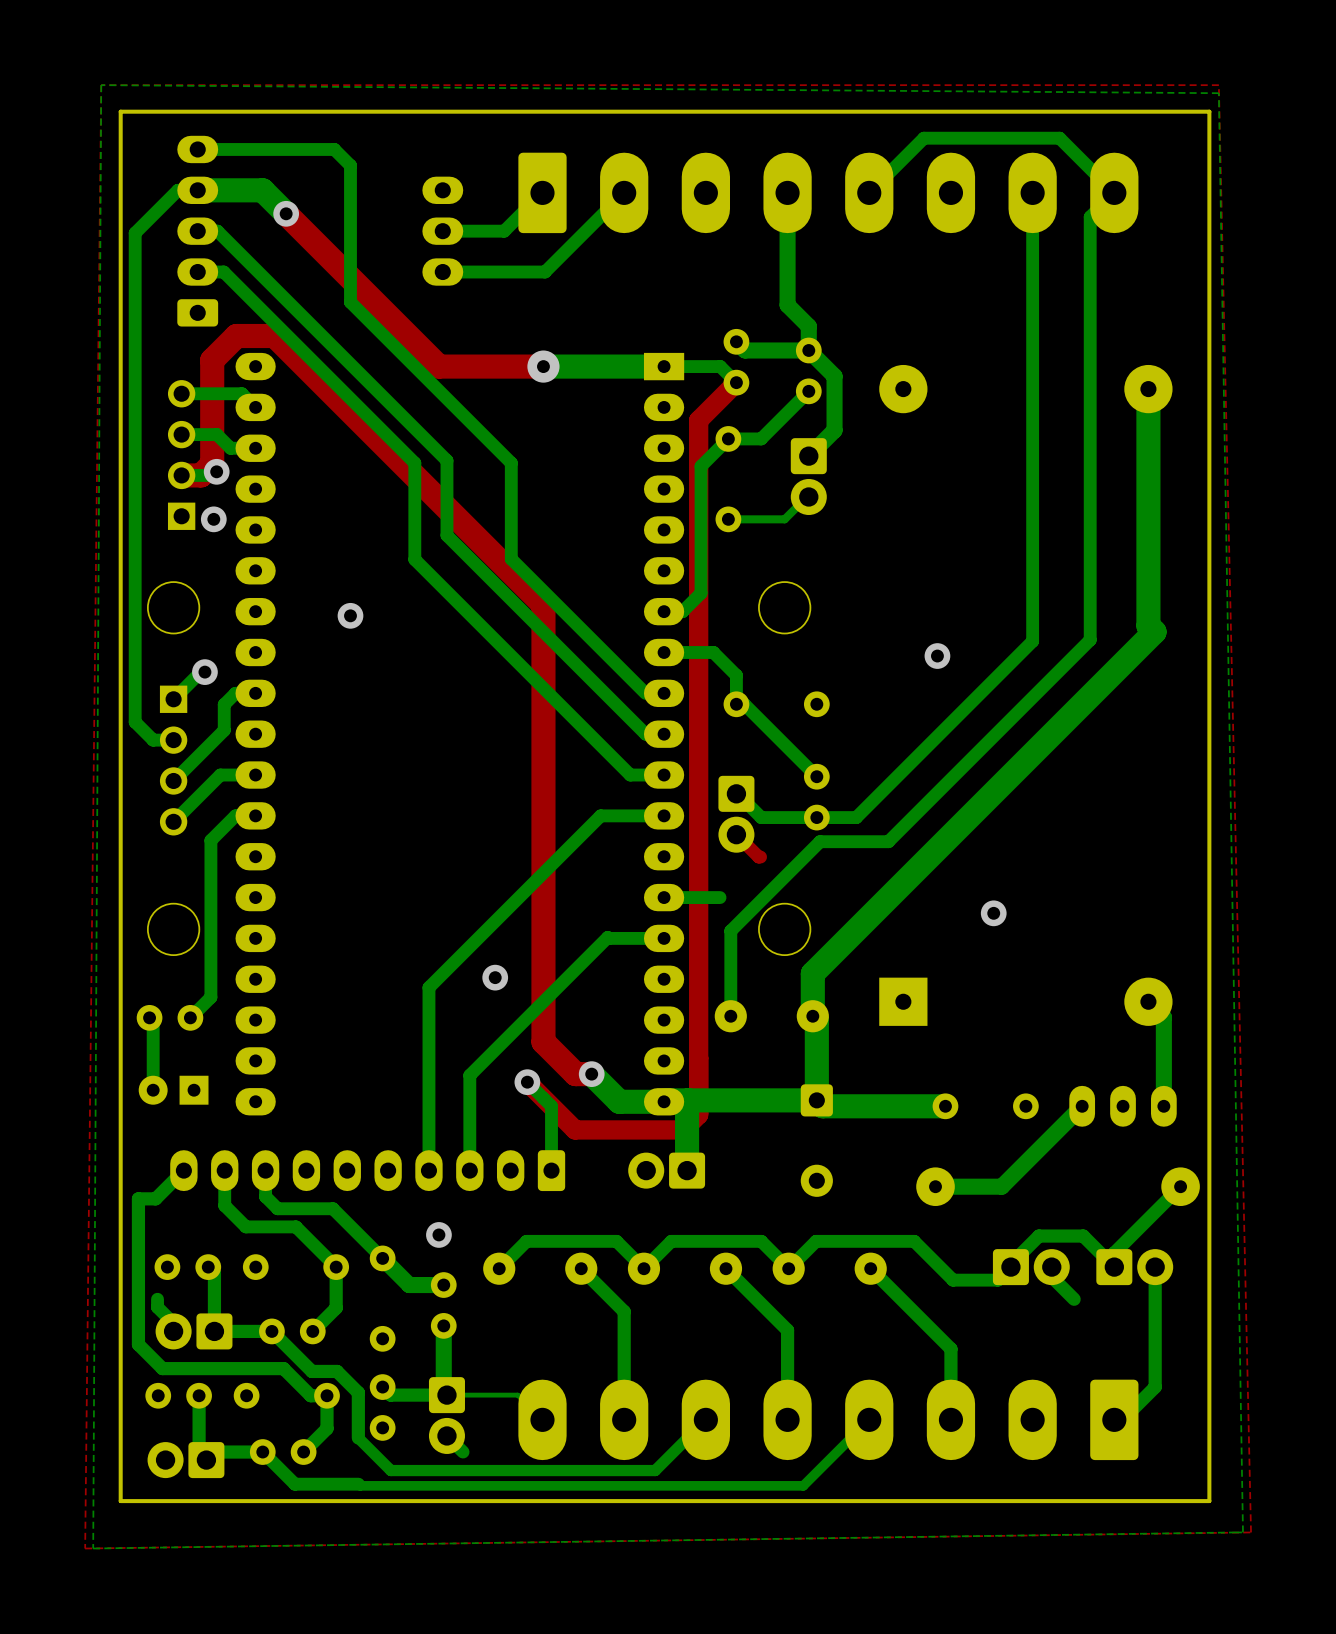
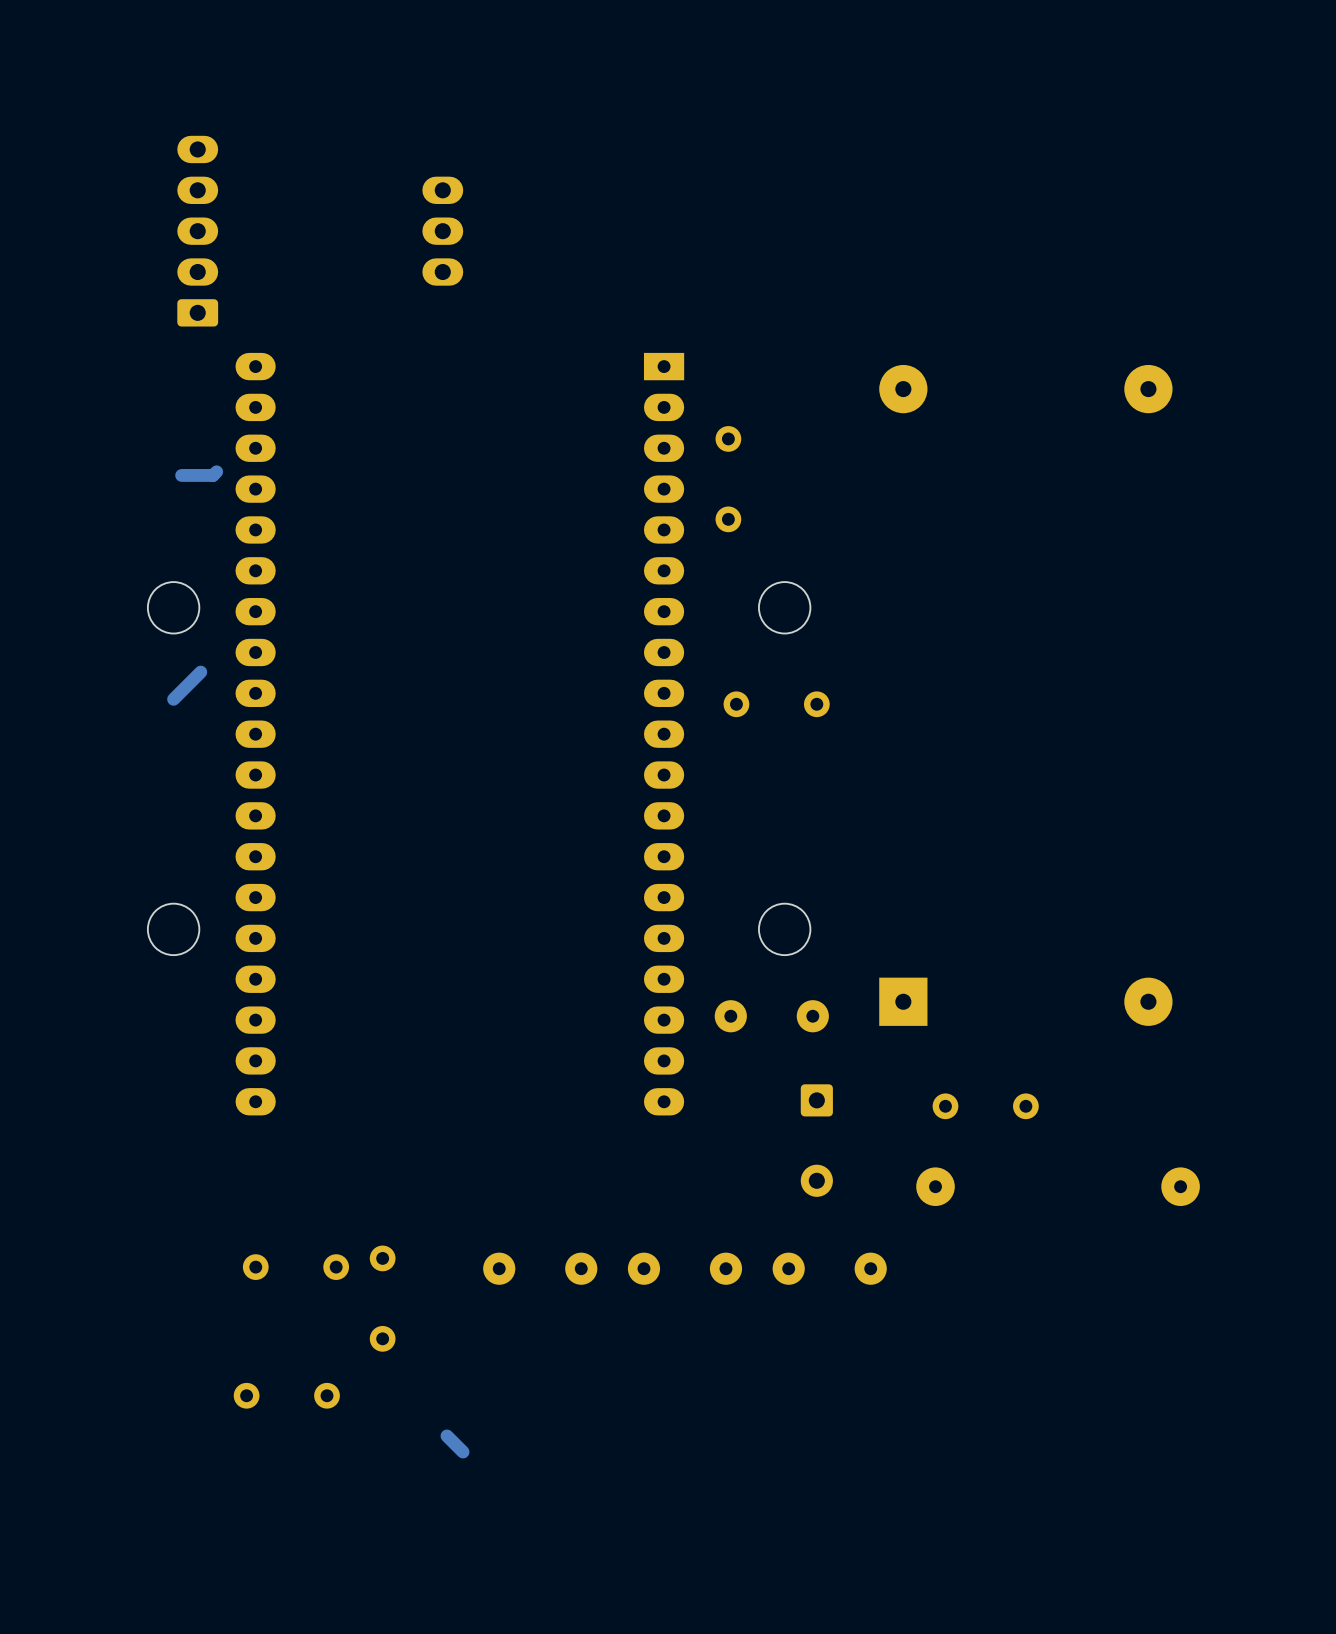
bottom zone outline: (101, 85) (1218, 93) (1242, 1532) (93, 1548) (101, 85) -> none
top zone outline: (1218, 85) (101, 85) (85, 1548) (1251, 1532) (1218, 85) -> none
board edge: (1209, 111) (120, 111) (120, 1501) (1209, 1501) (1209, 111) -> none
bottom track: (197, 149) (334, 149) (350, 165) (350, 302) (511, 463) (511, 559) (645, 693) -> none
bottom track: (542, 192) (504, 231) (442, 231) -> none
bottom track: (624, 192) (545, 272) (442, 272) -> none
bottom track: (787, 192) (787, 305) (808, 326) (808, 350) -> none
part: (828, 192) -> none
bottom track: (869, 192) (923, 138) (1059, 138) (1114, 192) (1090, 217) (1090, 639) (888, 841) (820, 841) (730, 930) (730, 1016) -> none
bottom track: (1032, 192) (1032, 641) (856, 817) (761, 817) (736, 793) -> none
top track: (286, 213) (438, 366) (543, 366) -> none
bottom track: (286, 213) (262, 190) (177, 190) (135, 233) (135, 722) (153, 740) (173, 740) -> none
via: (286, 213) -> none
bottom track: (197, 231) (217, 231) (446, 460) (446, 535) (645, 734) (664, 734) -> none
bottom track: (197, 272) (223, 272) (414, 463) (414, 559) (630, 775) (664, 775) -> none
bottom track: (736, 341) (745, 350) (808, 350) -> none
bottom track: (808, 350) (834, 376) (834, 430) (808, 456) -> none
part: (736, 362) -> none
bottom track: (543, 366) (720, 366) (736, 382) -> none
via: (543, 366) -> none
part: (808, 370) -> none
top track: (736, 382) (698, 420) (698, 1114) (683, 1129) (575, 1129) (527, 1082) (574, 1129) (682, 1129) (698, 1113) -> none
bottom track: (1148, 389) (1148, 625) (1154, 631) (812, 973) (812, 1016) (816, 1020) (816, 1100) -> none
bottom track: (181, 390) (181, 393) (241, 393) (255, 407) -> none
bottom track: (808, 391) (761, 438) (728, 438) (701, 466) (701, 593) (682, 611) (664, 611) -> none
bottom track: (181, 434) (216, 434) (230, 448) (237, 448) -> none
part: (181, 455) -> none
via: (216, 471) -> none
top track: (181, 475) (200, 475) (212, 464) (212, 360) (236, 336) (274, 336) (543, 604) (543, 1041) (575, 1074) (591, 1074) -> none
part: (808, 476) -> none
bottom track: (808, 496) (784, 519) (728, 519) -> none
via: (213, 519) -> none
via: (350, 615) -> none
bottom track: (664, 652) (713, 652) (736, 675) (736, 704) (744, 704) (816, 776) -> none
via: (937, 656) -> none
via: (204, 672) -> none
bottom track: (255, 693) (235, 693) (224, 704) (224, 730) (173, 780) -> none
part: (173, 760) -> none
bottom track: (255, 775) (220, 775) (173, 821) -> none
part: (816, 797) -> none
part: (736, 814) -> none
bottom track: (255, 815) (235, 815) (210, 840) (210, 997) (190, 1017) -> none
bottom track: (664, 815) (600, 815) (428, 987) (428, 1170) -> none
top track: (736, 834) (760, 857) -> none
bottom track: (720, 897) (664, 897) -> none
via: (993, 913) -> none
bottom track: (664, 938) (607, 937) (469, 1075) (469, 1170) -> none
via: (495, 977) -> none
bottom track: (1148, 1001) (1163, 1017) (1163, 1106) -> none
bottom track: (149, 1017) (153, 1021) (153, 1090) -> none
part: (169, 1017) -> none
bottom track: (591, 1074) (619, 1101) (816, 1100) -> none
via: (591, 1074) -> none
bottom track: (527, 1082) (551, 1106) (551, 1170) -> none
via: (527, 1082) -> none
part: (173, 1090) -> none
bottom track: (688, 1100) (687, 1170) -> none
bottom track: (816, 1100) (822, 1106) (945, 1106) -> none
bottom track: (1082, 1106) (1001, 1186) (935, 1186) -> none
part: (1123, 1106) -> none
bottom track: (183, 1170) (155, 1198) (138, 1198) (138, 1344) (162, 1368) (283, 1368) (310, 1395) (327, 1395) (327, 1428) (303, 1452) -> none
bottom track: (224, 1170) (224, 1205) (245, 1226) (295, 1226) (336, 1267) (336, 1308) (312, 1331) -> none
bottom track: (265, 1170) (265, 1196) (277, 1208) (332, 1208) (409, 1285) (443, 1285) -> none
part: (367, 1170) -> none
part: (666, 1170) -> none
bottom track: (1180, 1186) (1114, 1252) (1114, 1267) (1083, 1236) (1038, 1236) (997, 1280) (953, 1280) (914, 1241) (816, 1241) (788, 1268) (761, 1241) (671, 1241) (643, 1268) (616, 1241) (526, 1241) (499, 1268) -> none
via: (438, 1234) -> none
part: (187, 1267) -> none
bottom track: (208, 1267) (214, 1273) (214, 1331) (271, 1331) (311, 1371) (337, 1371) (358, 1392) (358, 1437) (390, 1470) (655, 1470) (705, 1419) -> none
part: (1031, 1267) -> none
part: (1134, 1267) -> none
bottom track: (1155, 1267) (1155, 1387) (1122, 1419) (1114, 1419) -> none
bottom track: (581, 1268) (624, 1311) (624, 1419) -> none
bottom track: (725, 1268) (787, 1330) (787, 1419) -> none
bottom track: (870, 1268) (950, 1348) (950, 1419) -> none
bottom track: (1051, 1276) (1074, 1299) -> none
bottom track: (157, 1299) (157, 1307) (173, 1323) (173, 1331) -> none
part: (443, 1305) -> none
bottom track: (443, 1325) (443, 1391) (446, 1395) -> none
part: (194, 1331) -> none
part: (292, 1331) -> none
bottom track: (382, 1387) (390, 1395) (446, 1395) -> none
part: (178, 1395) -> none
bottom track: (199, 1395) (199, 1452) (206, 1460) (214, 1452) (262, 1452) (294, 1484) (803, 1485) (869, 1419) -> none
bottom track: (446, 1395) (517, 1395) (542, 1419) -> none
part: (382, 1407) -> none
part: (446, 1415) -> none
part: (828, 1419) -> none
part: (283, 1452) -> none
part: (185, 1460) -> none

